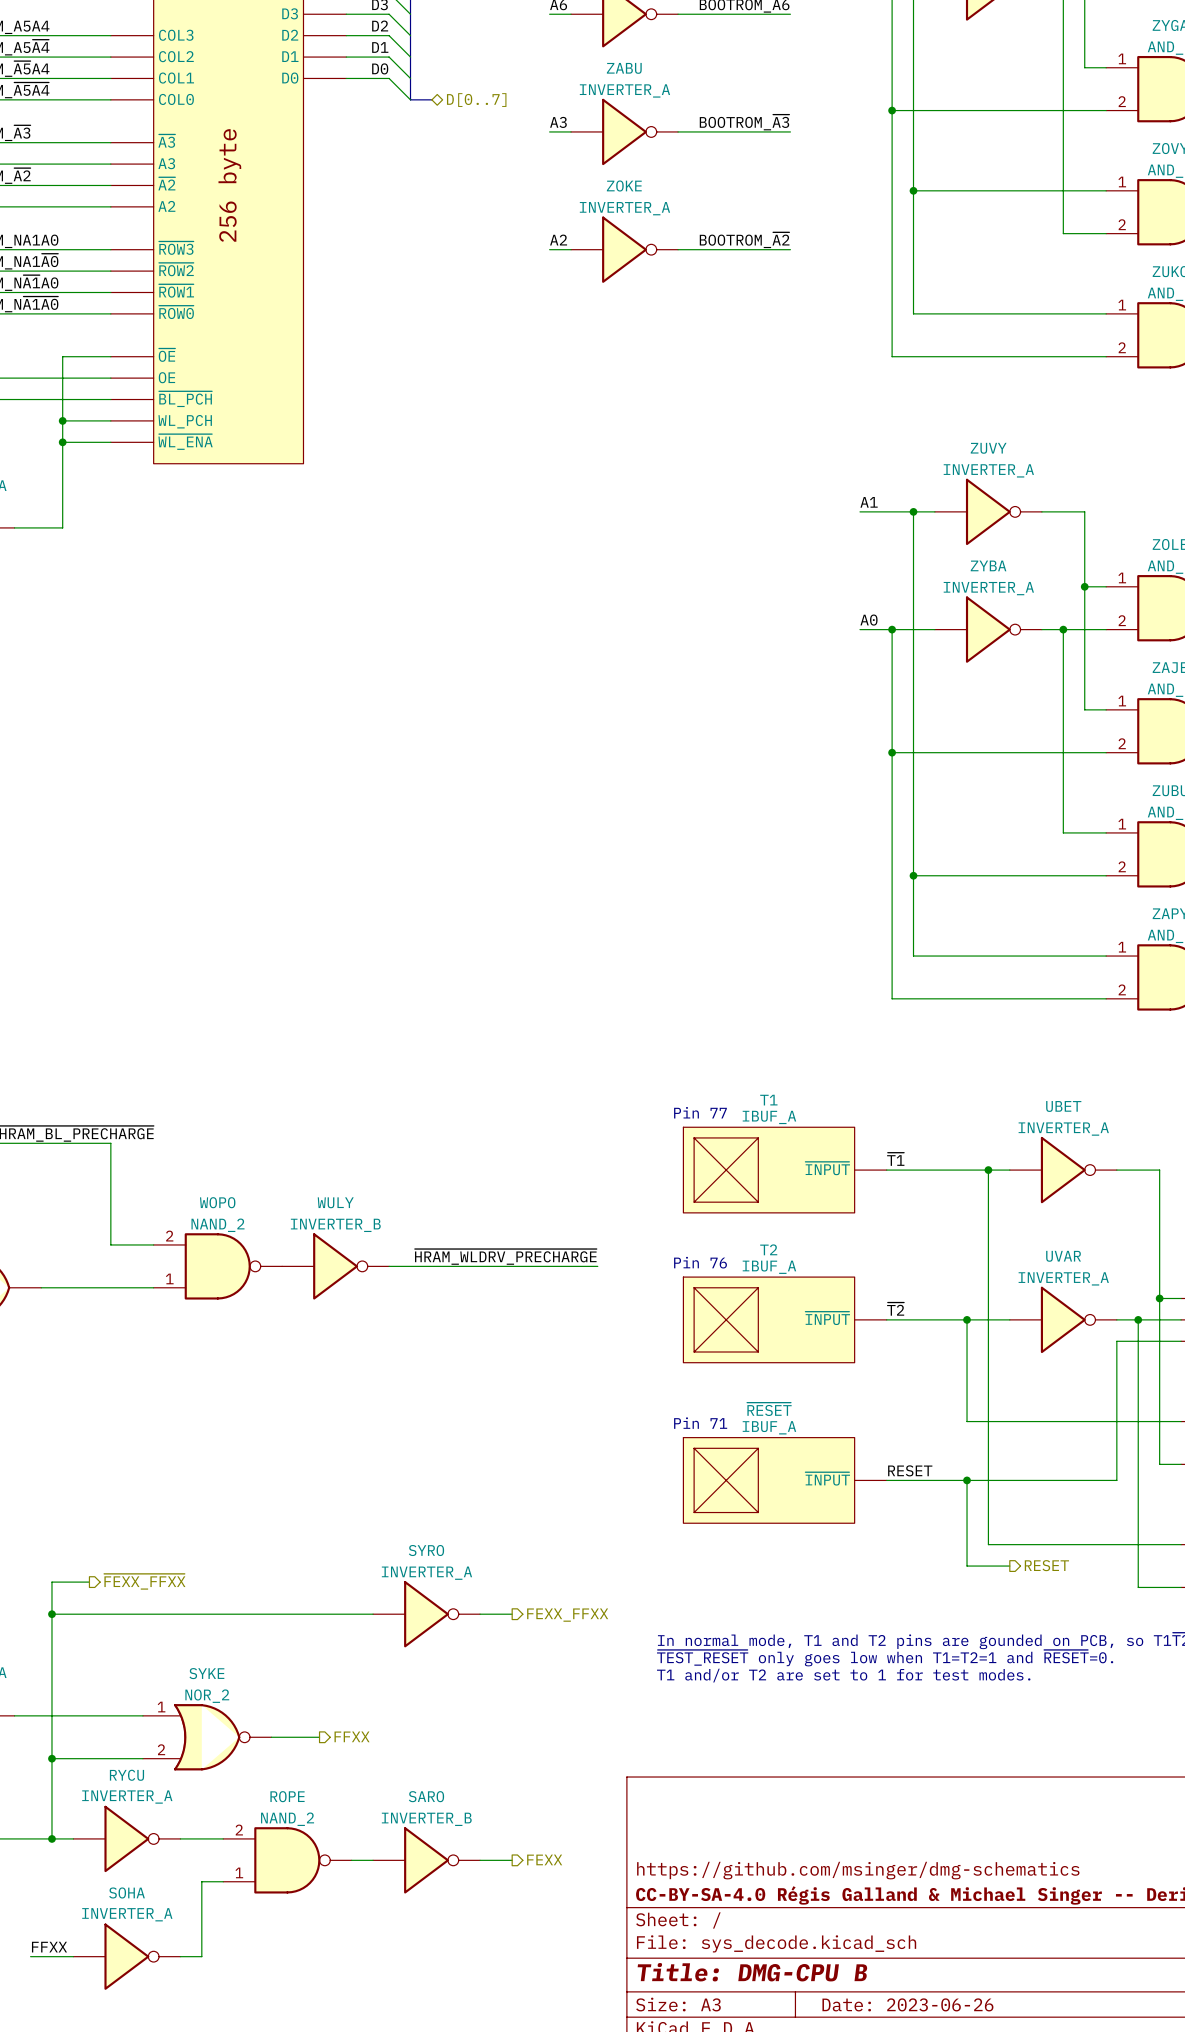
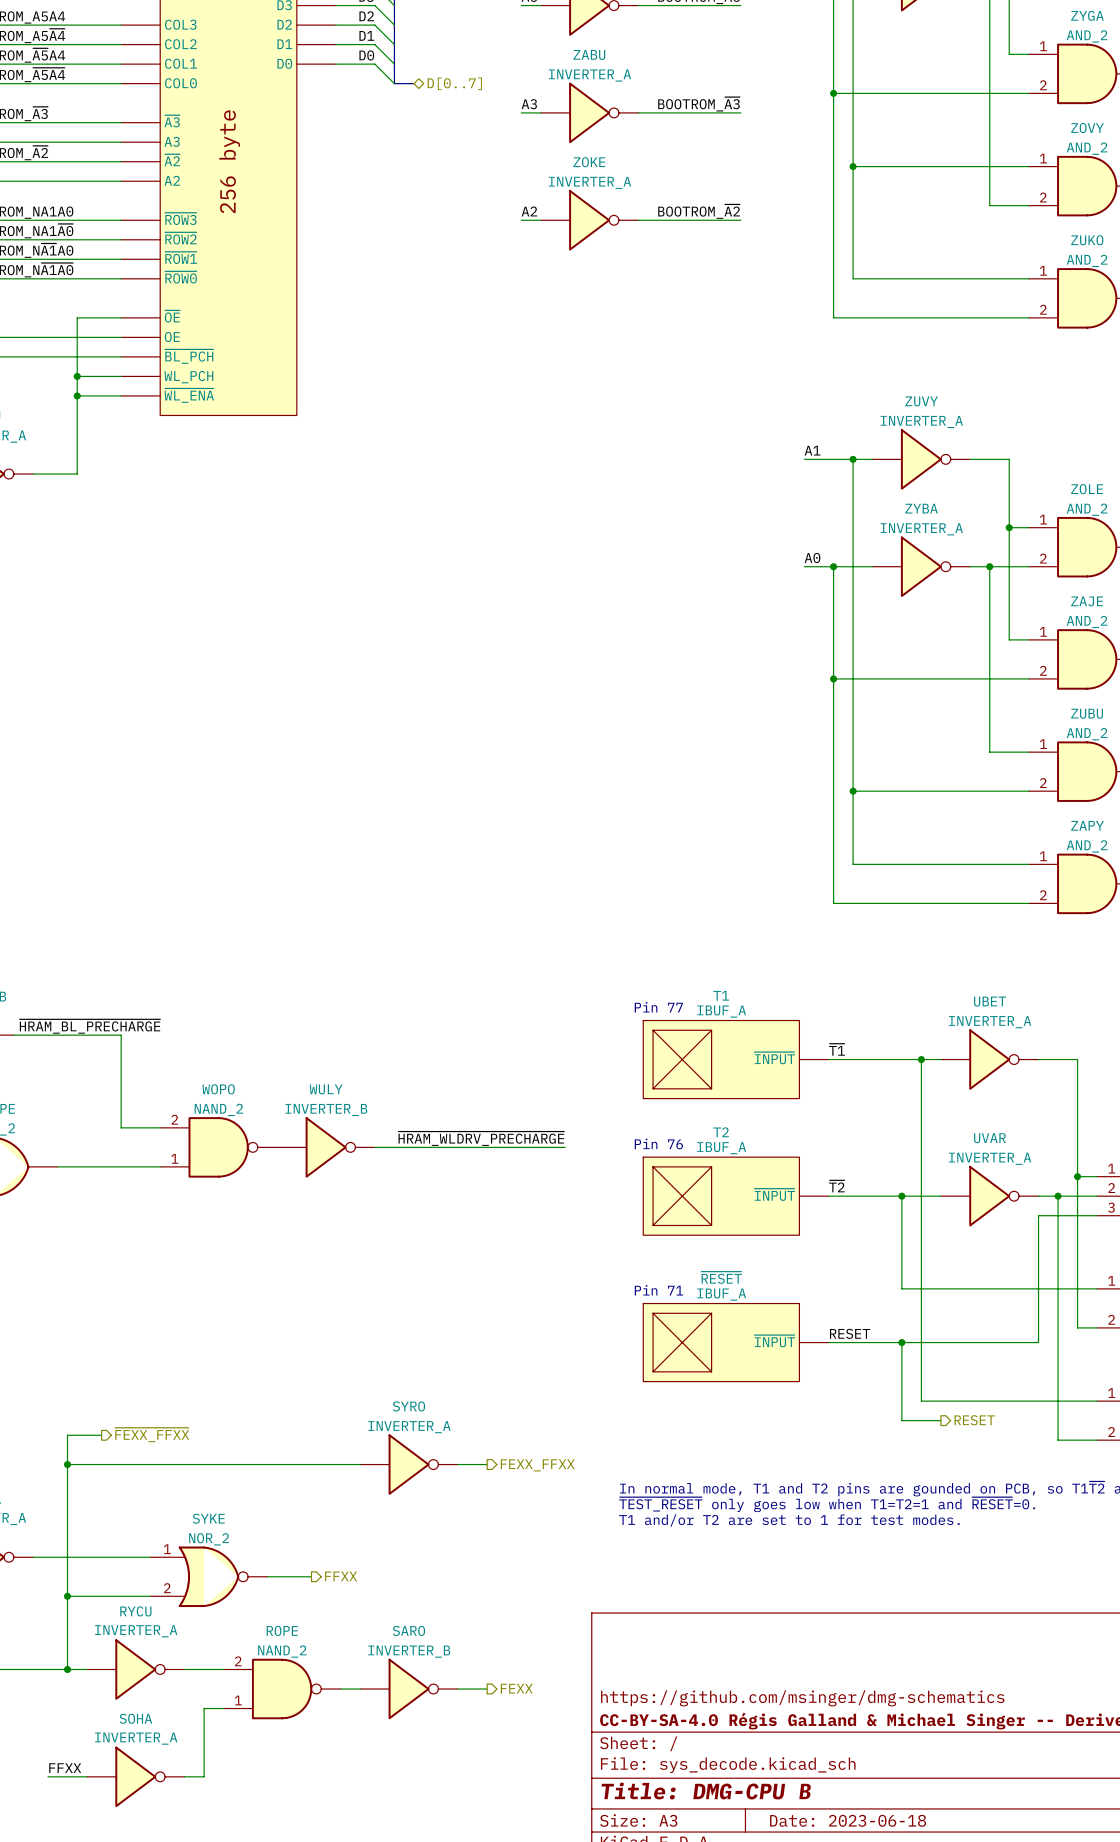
title block: Date: 2023-06-26 (907, 2004) -> Date: 2023-06-18 (848, 1820)

